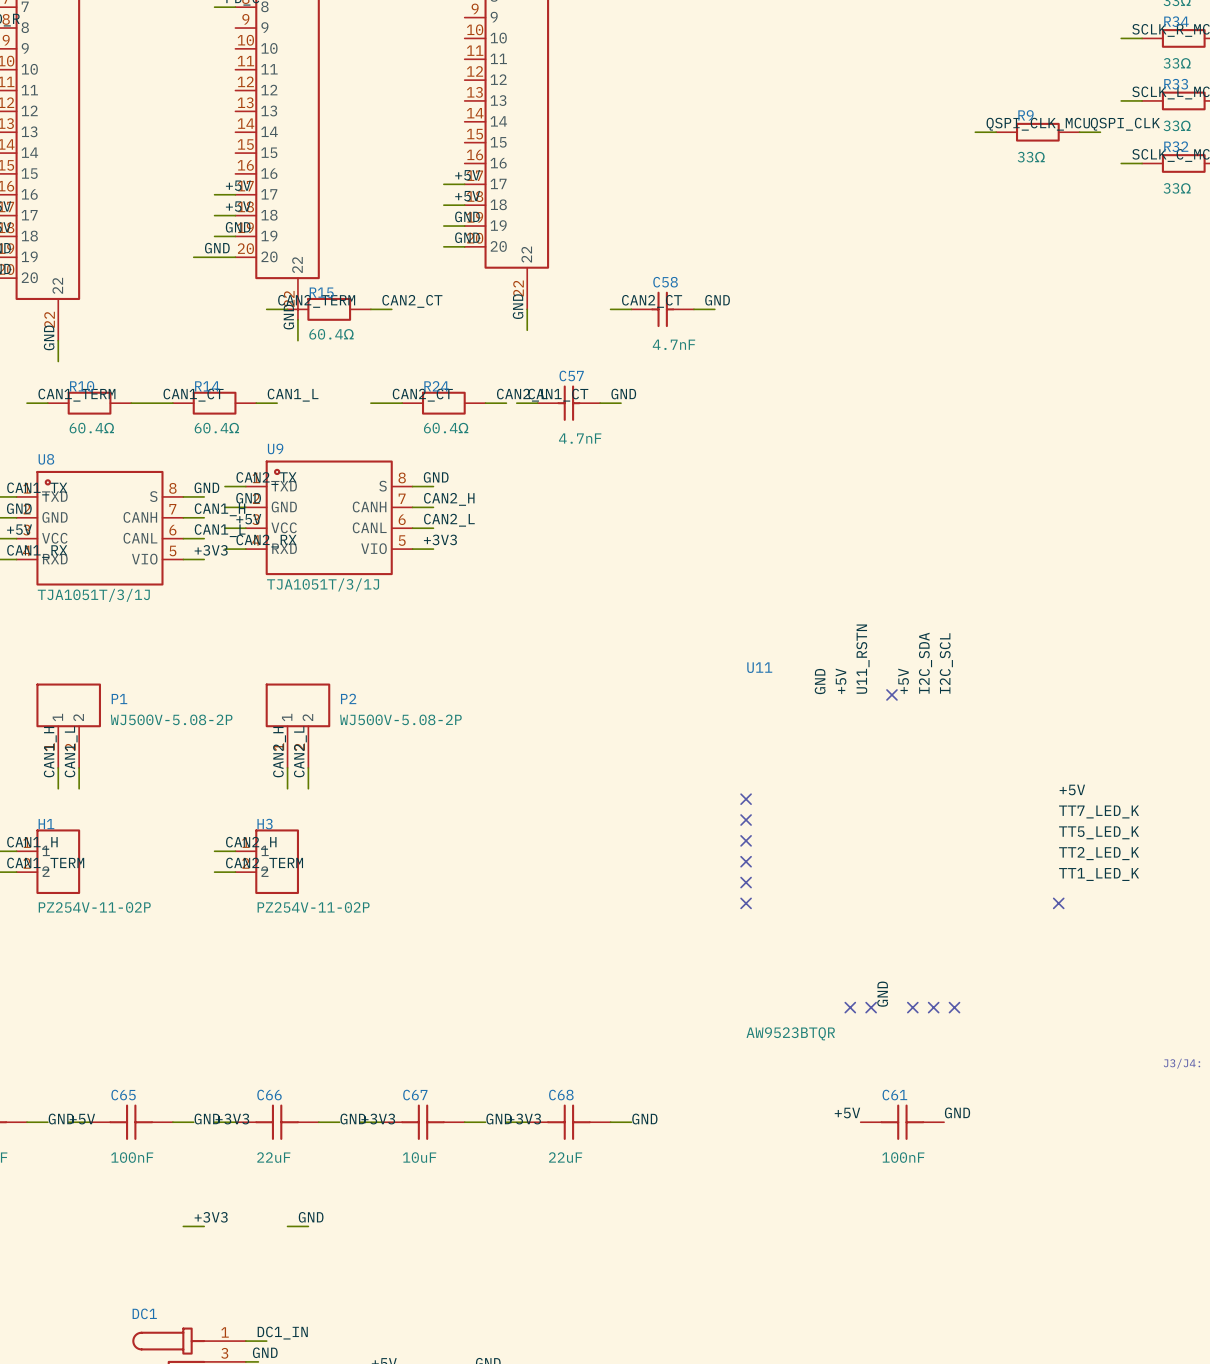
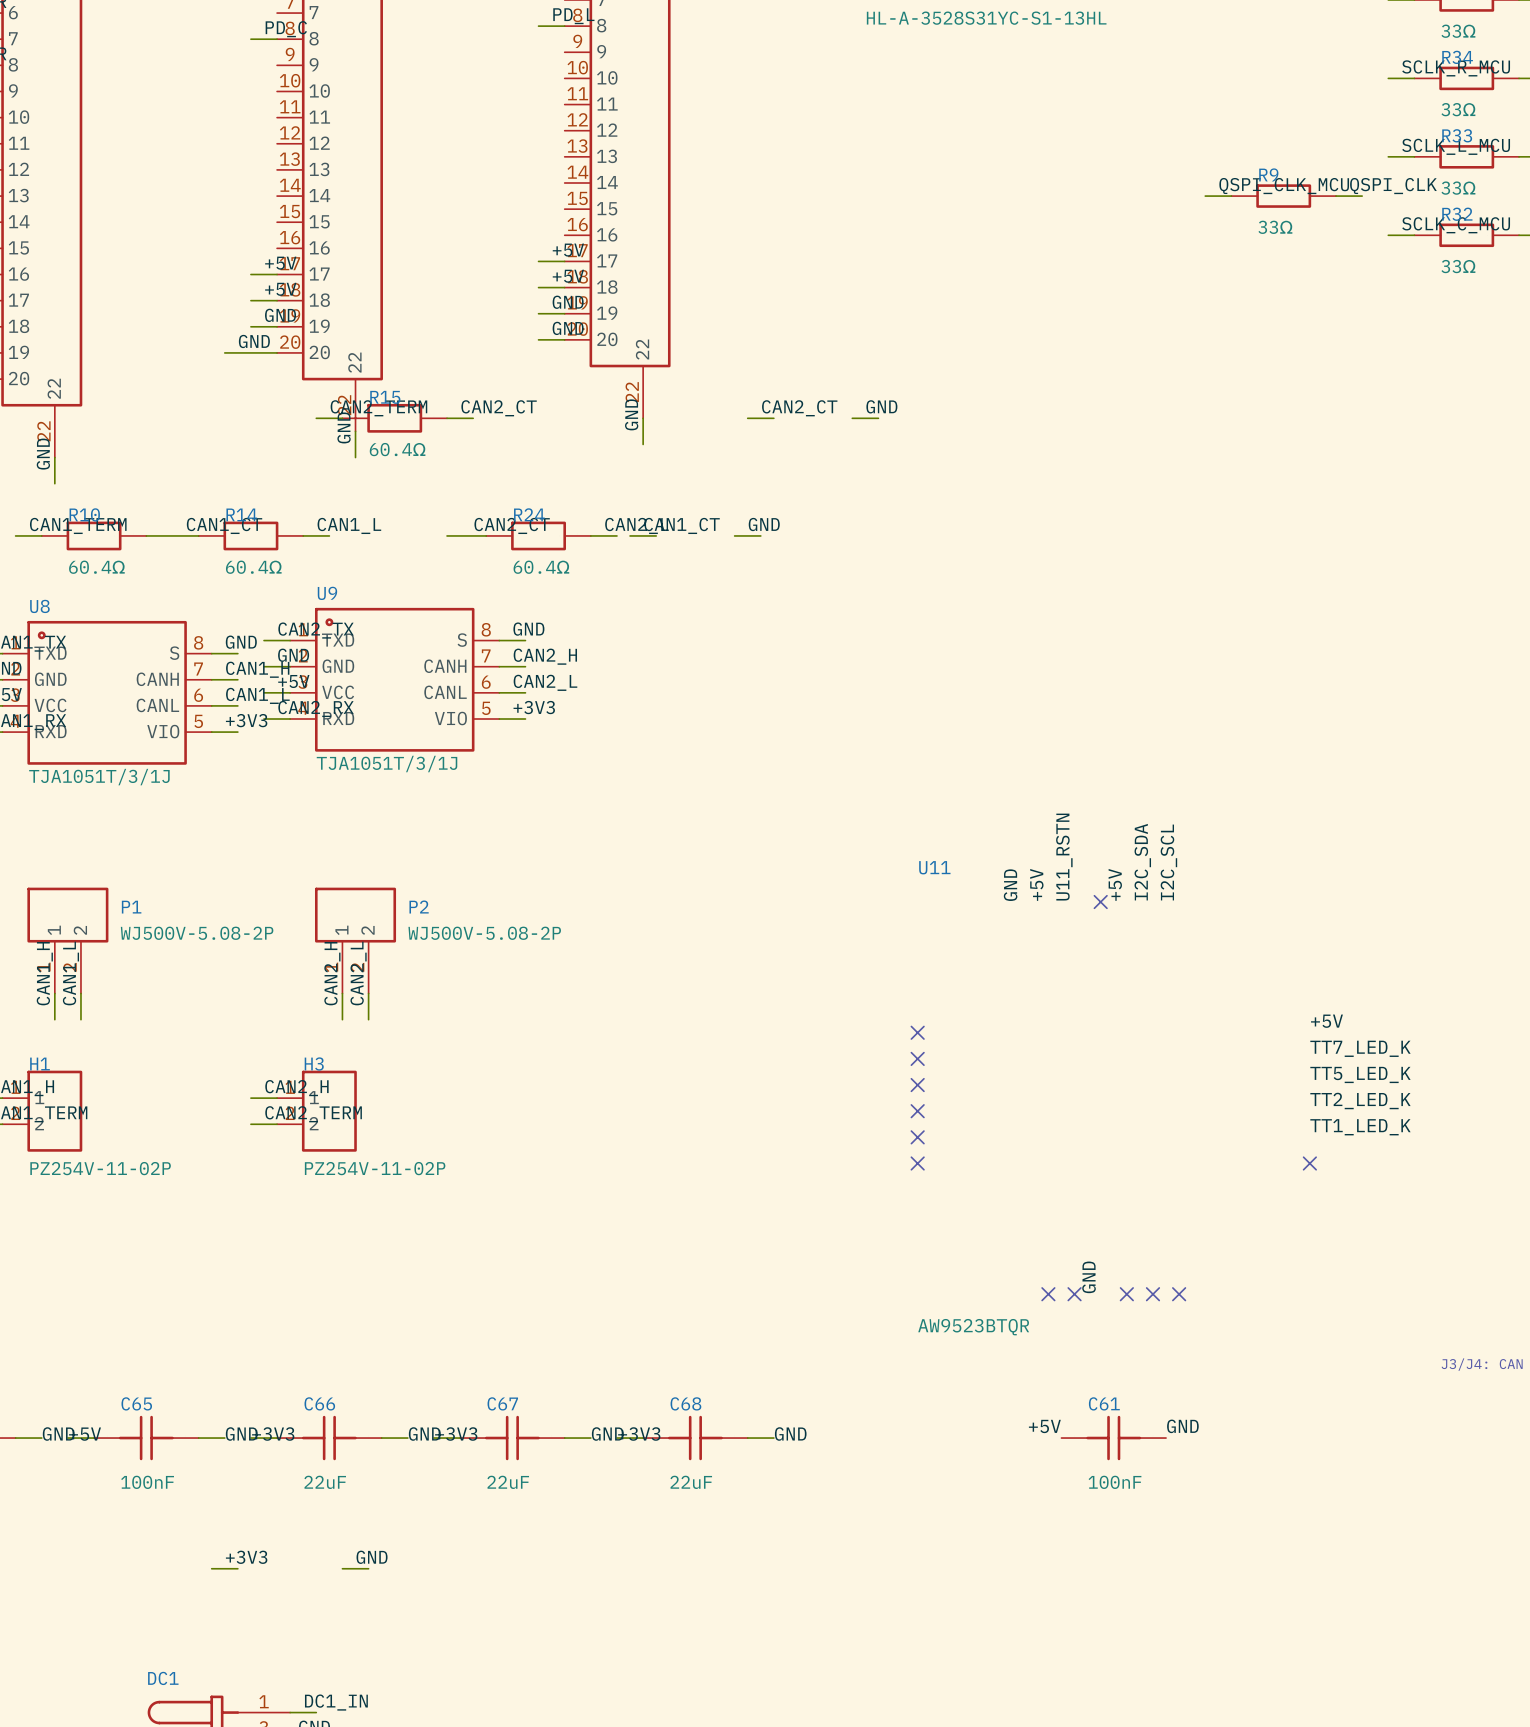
C58: 4.7nF (662, 309) -> none
C57: 4.7nF (568, 403) -> none
C67 value: 10uF (419, 1157) -> 22uF (508, 1482)

